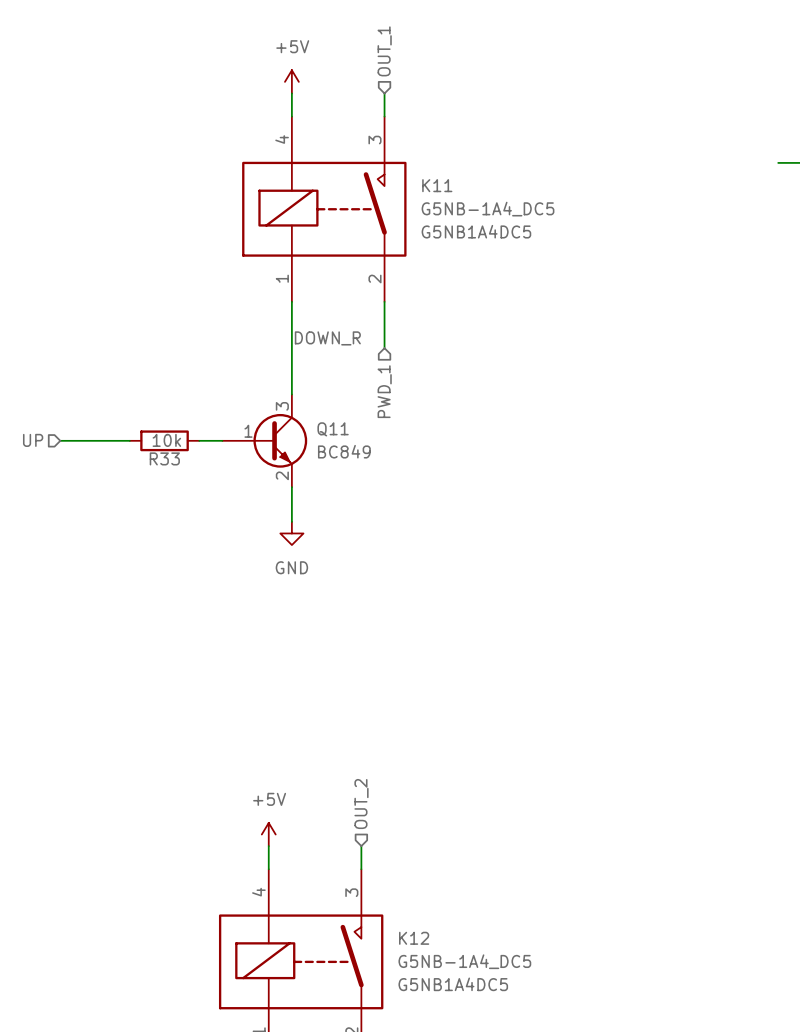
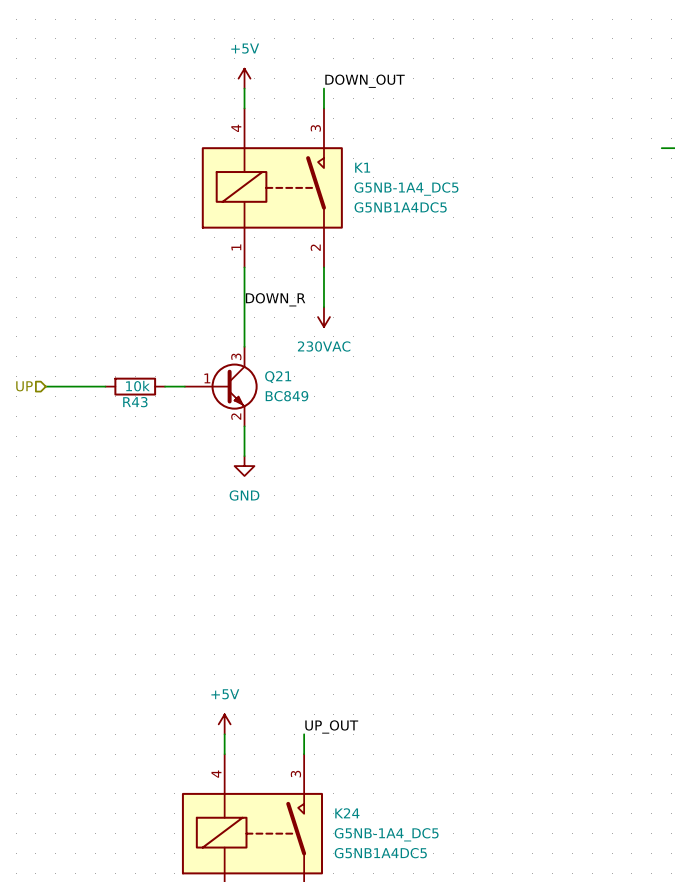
hierarchical label: OUT_1 (384, 51) -> none
label: none -> DOWN_OUT (365, 81)
K11 name: K11 (437, 185) -> K1 (362, 167)
power symbol: none -> 230VAC (323, 317)
hierarchical label: PWD_1 (384, 391) -> none
Q11 name: Q11 (333, 429) -> Q21 (278, 377)
R33 name: R33 (164, 458) -> R43 (135, 402)
hierarchical label: OUT_2 (361, 804) -> none
label: none -> UP_OUT (331, 726)
K12 name: K12 (414, 938) -> K24 (347, 813)

